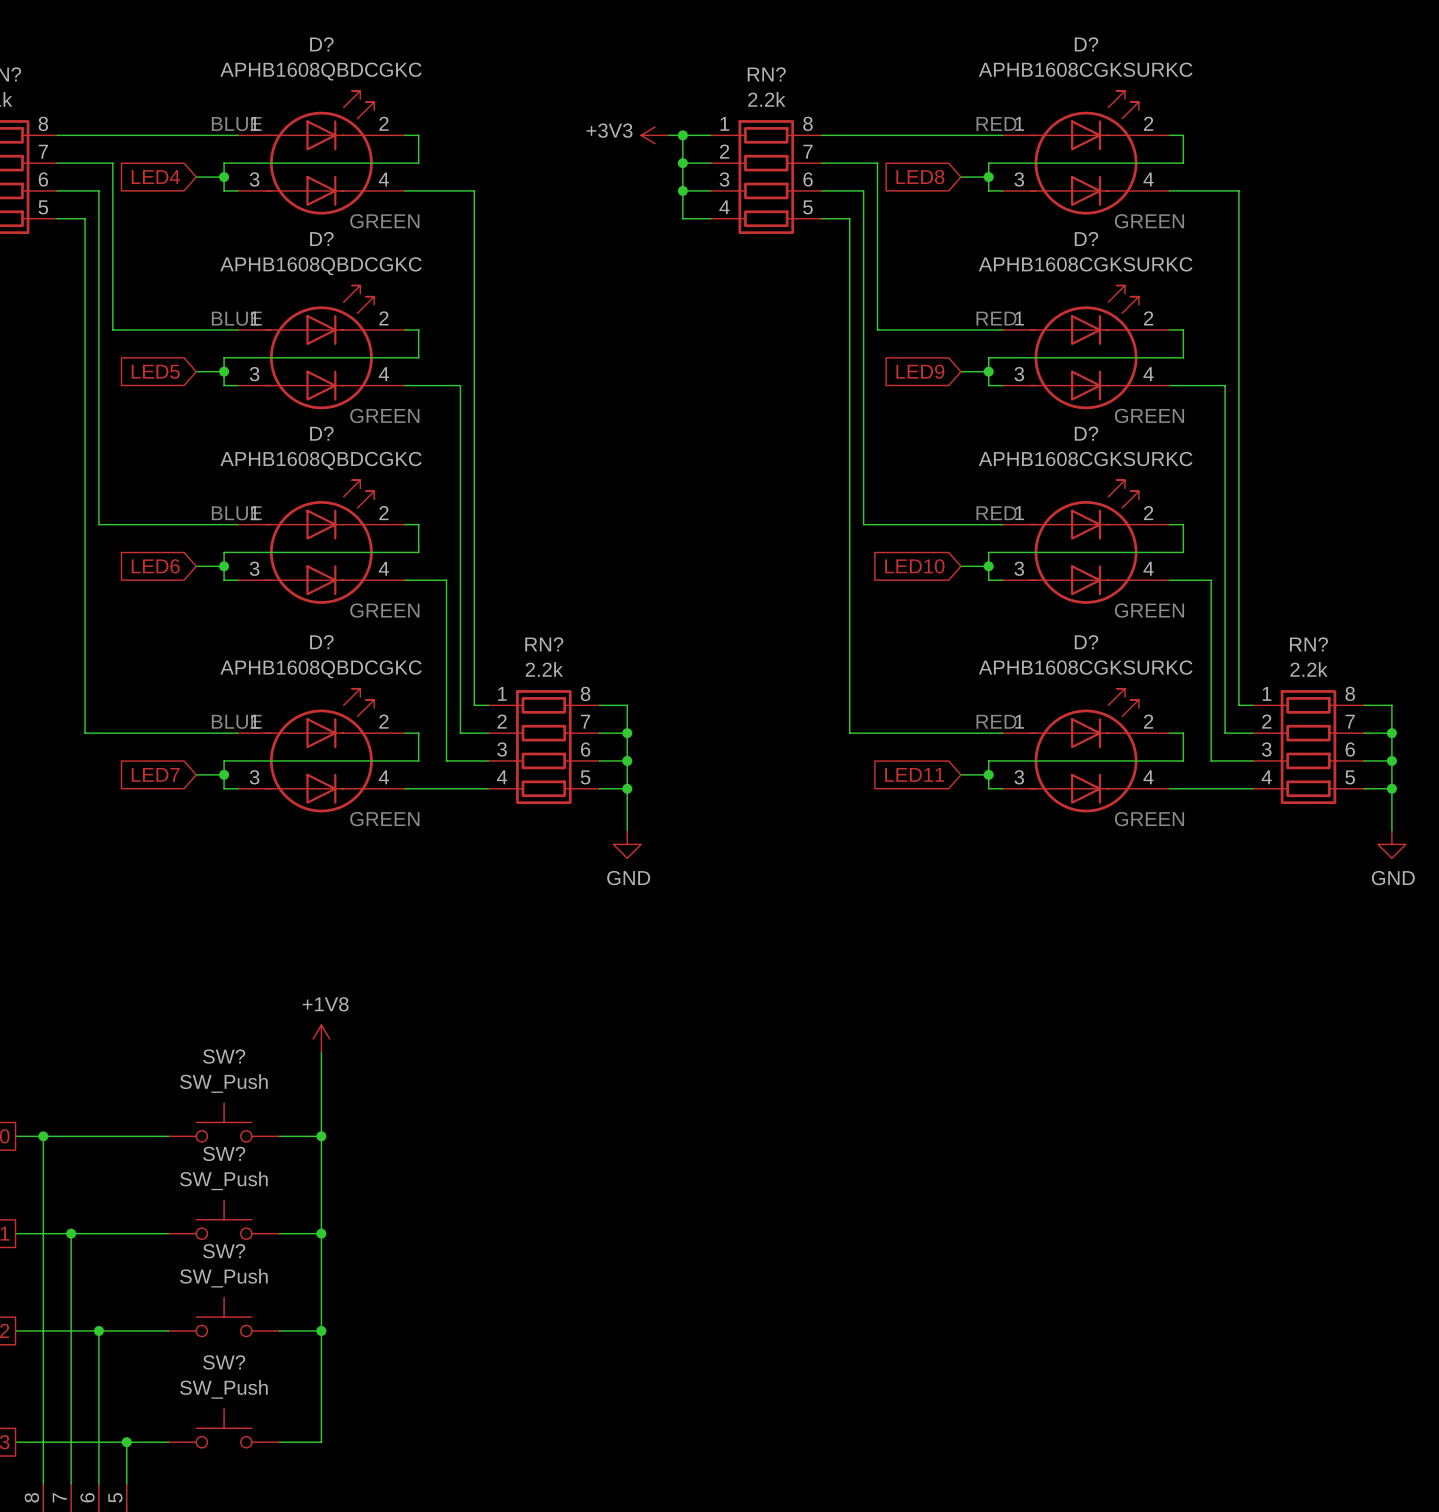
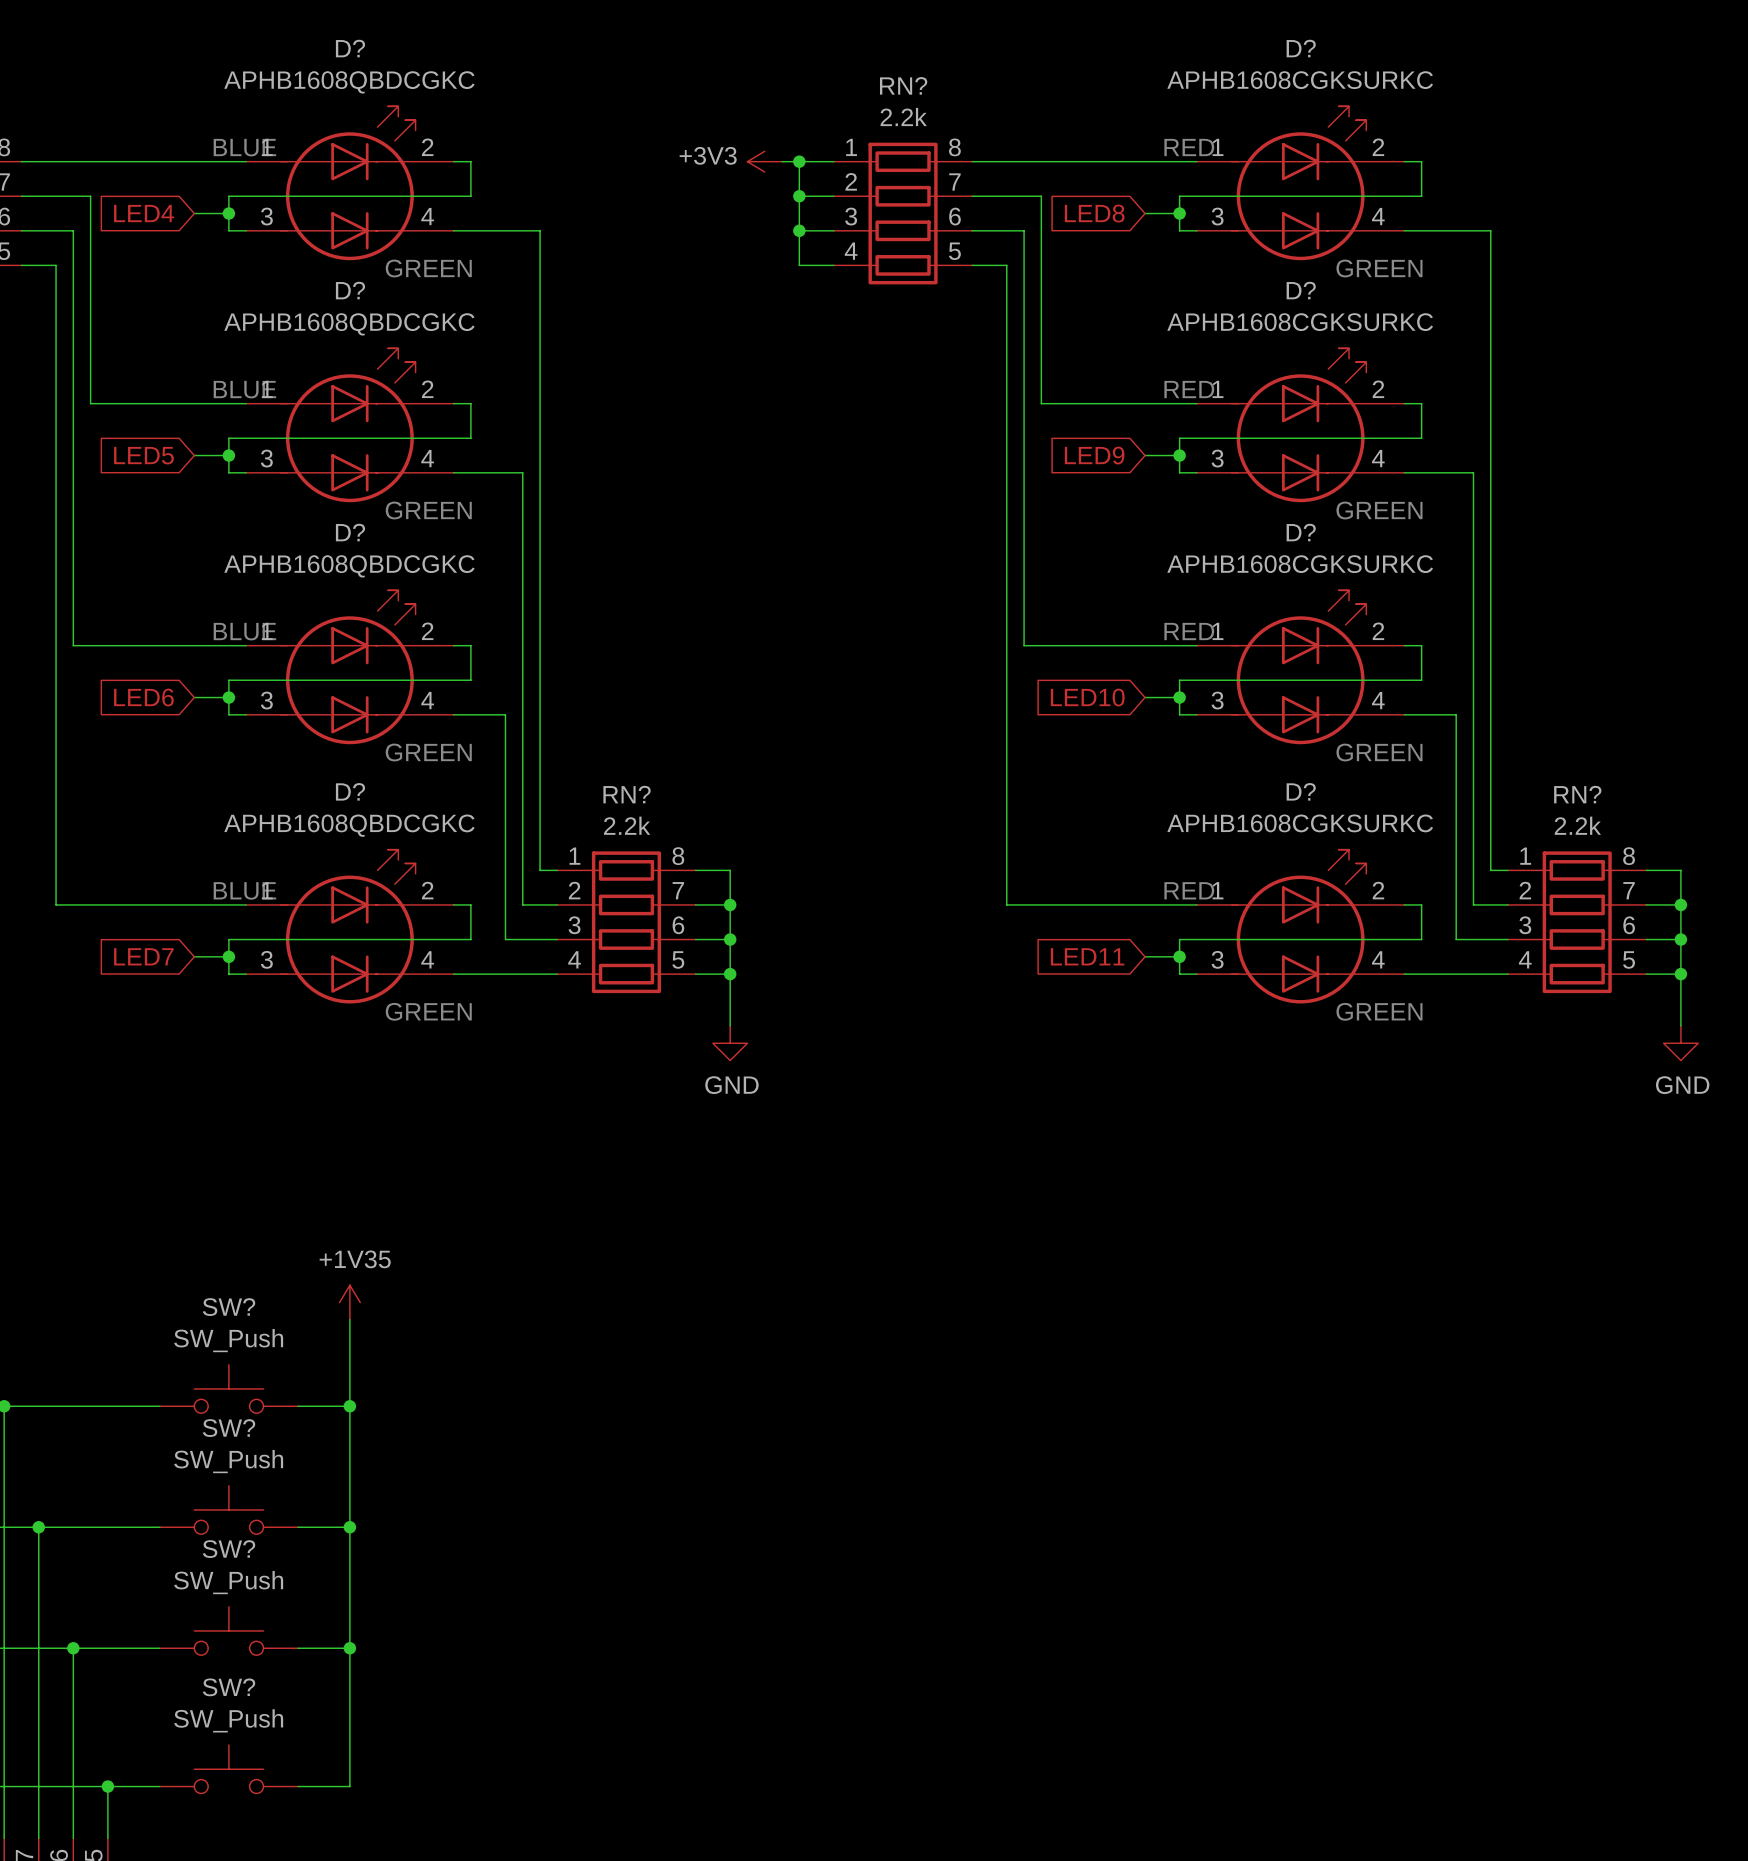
power symbol: +1V8 (321, 1039) -> none
power symbol: none -> +1V35 (349, 1302)

